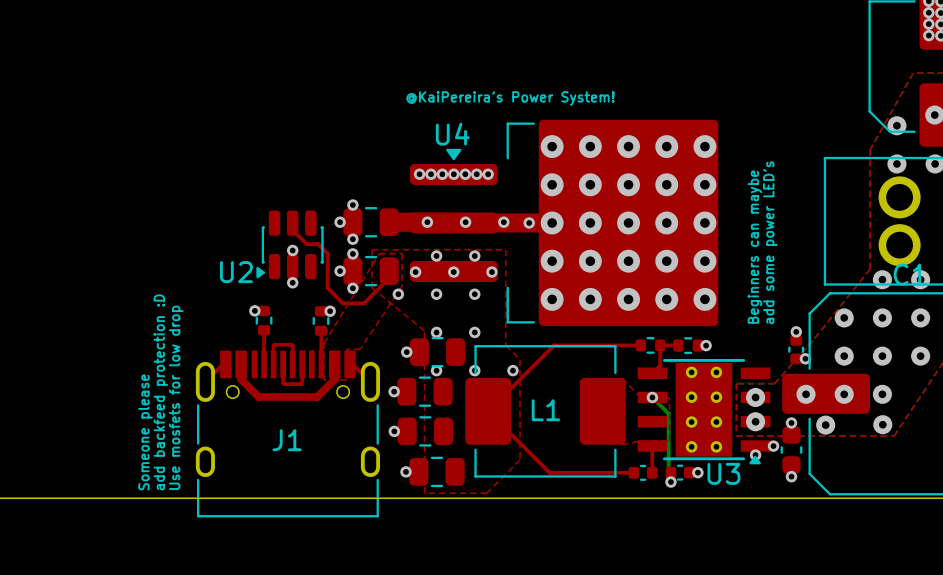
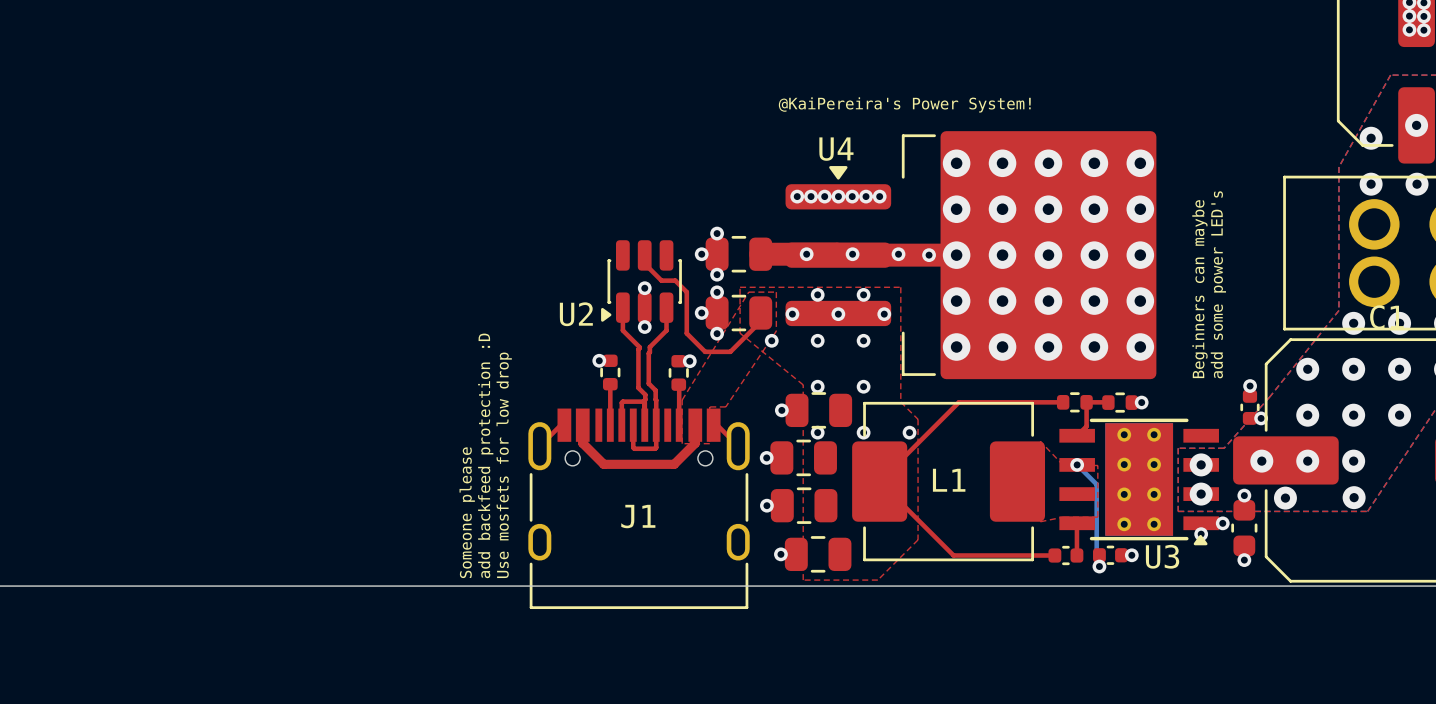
top track: none -> (622, 307) (622, 330) (639, 347) (638, 387) (645, 394) (644, 402)
top track: none -> (666, 307) (666, 330) (649, 347) (648, 353) (648, 383) (655, 390) (656, 425)

